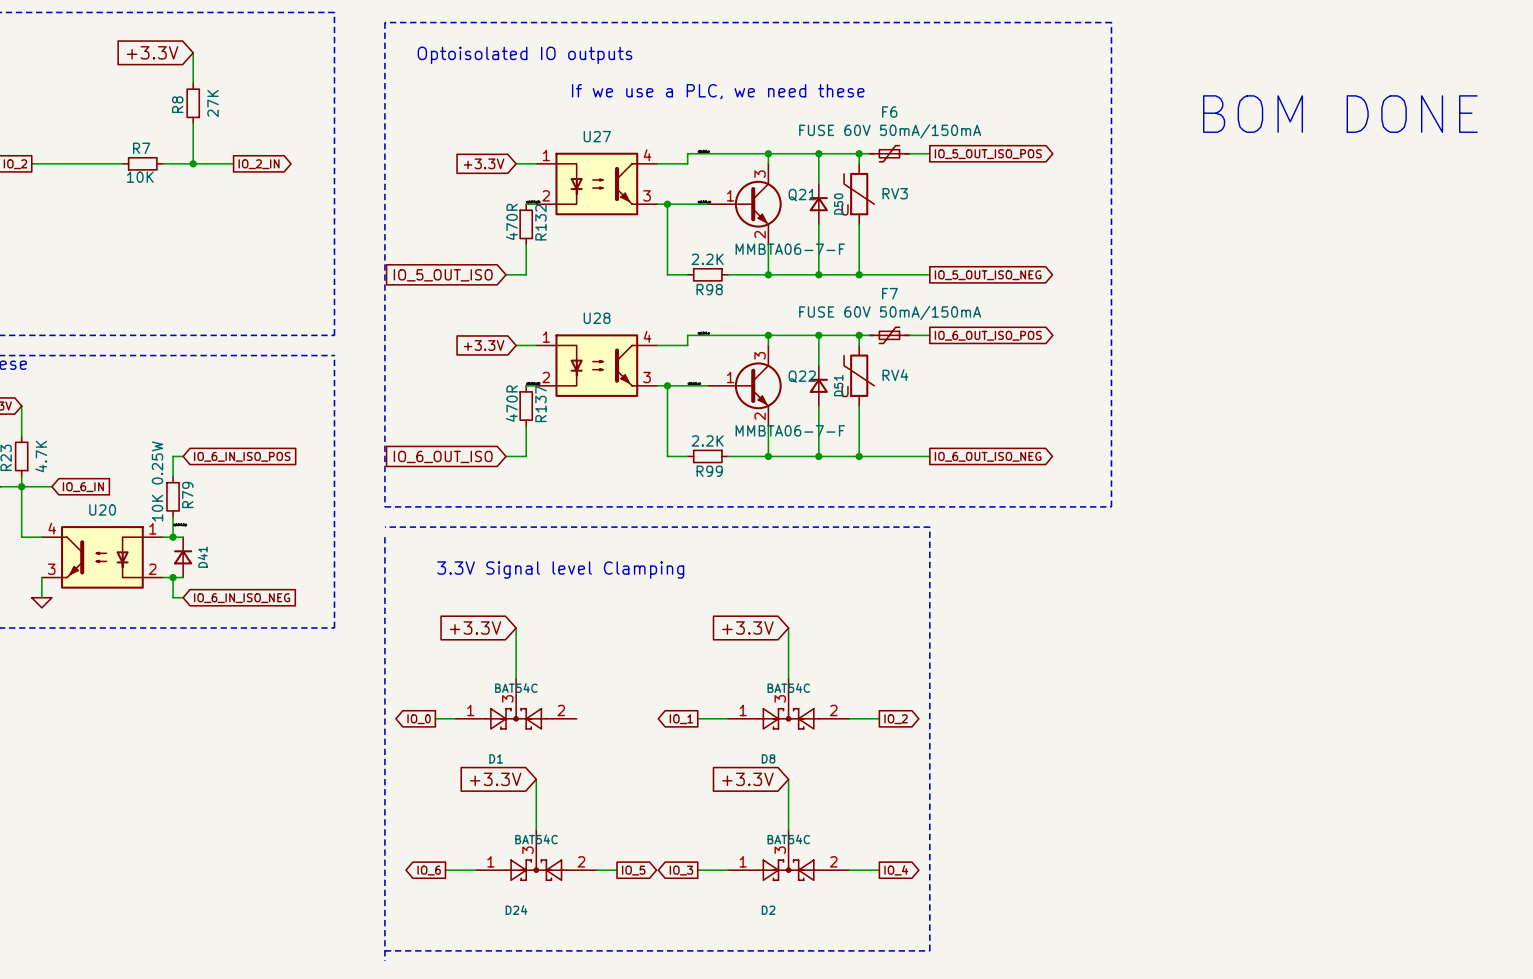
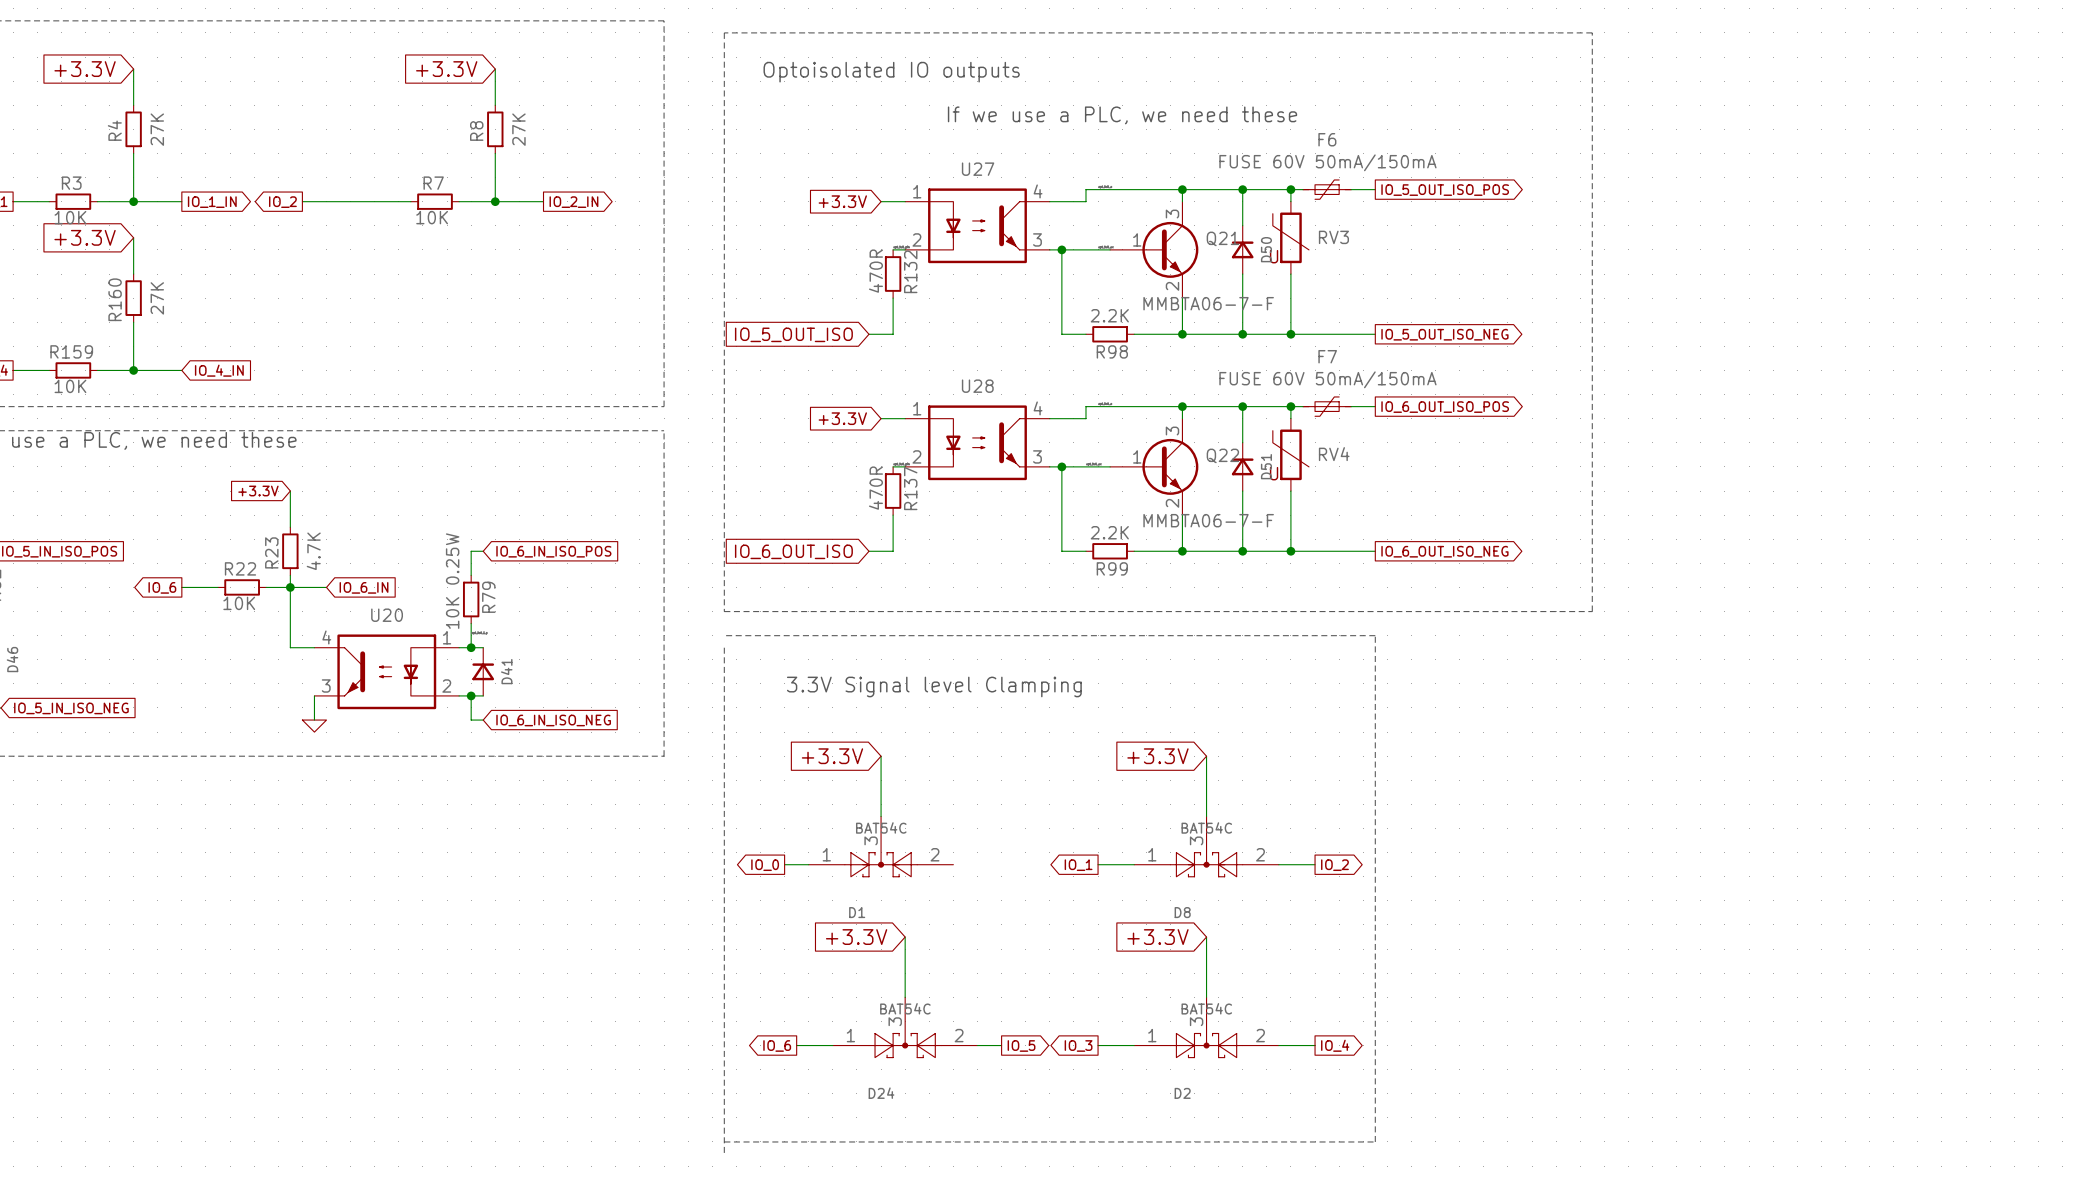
text: BOM DONE (1340, 114) -> none

